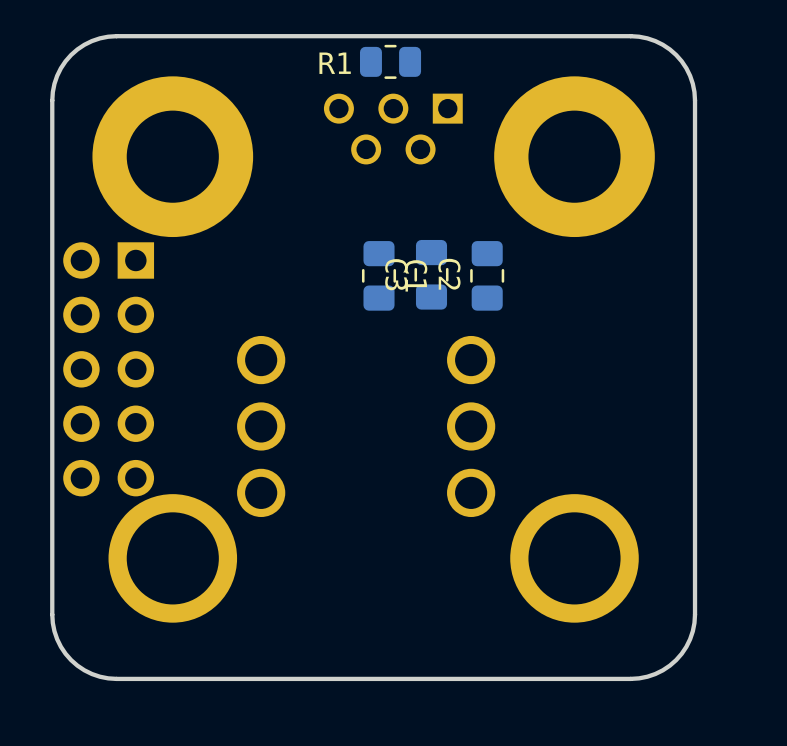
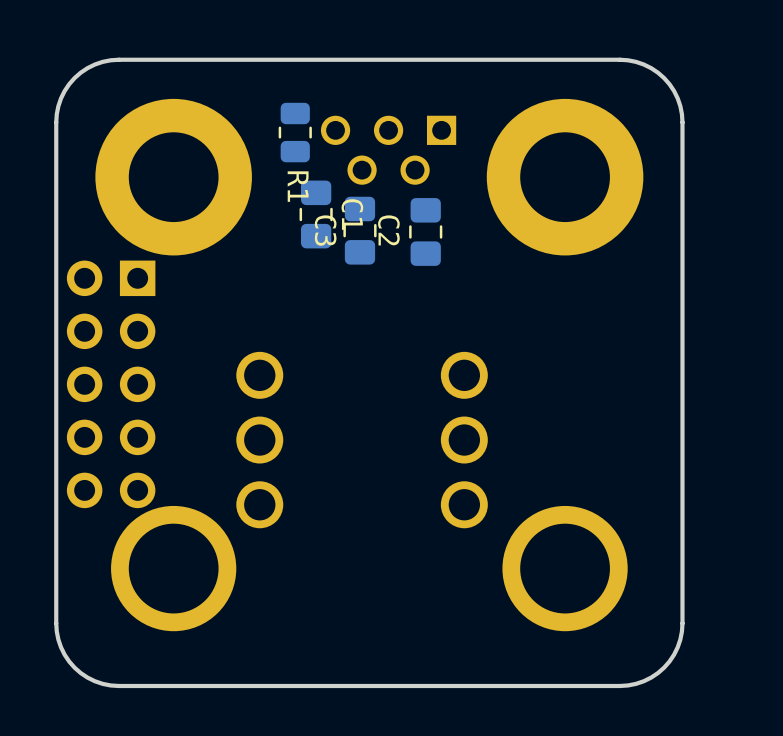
R1 rotation: 0° (390, 61) -> 90° clockwise (295, 132)
R1 position: (390, 61) -> (295, 132)
R1 name position: R1 (335, 63) -> R1 (298, 186)
C3 position: (431, 274) -> (359, 230)
C1 position: (379, 275) -> (316, 214)
C2 position: (487, 275) -> (425, 231)

